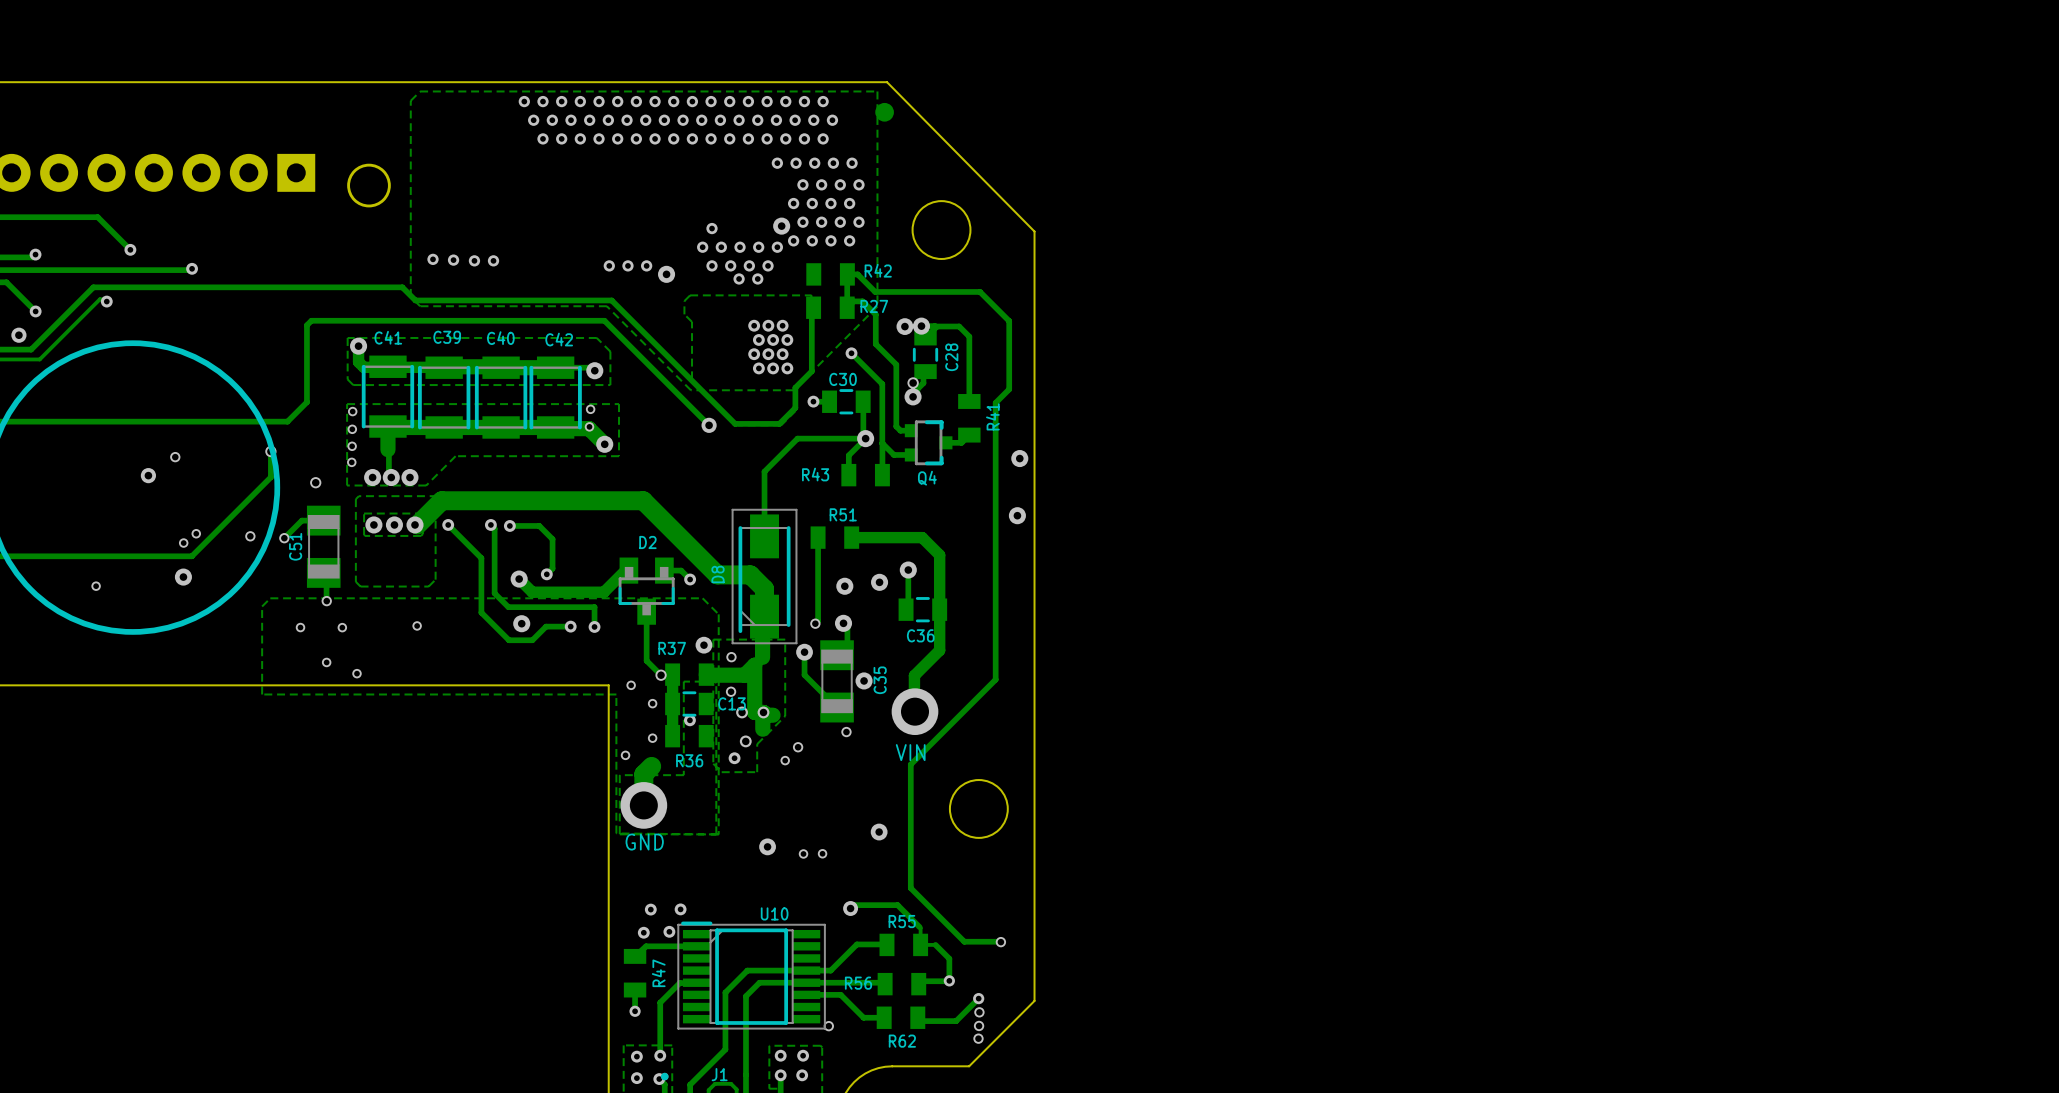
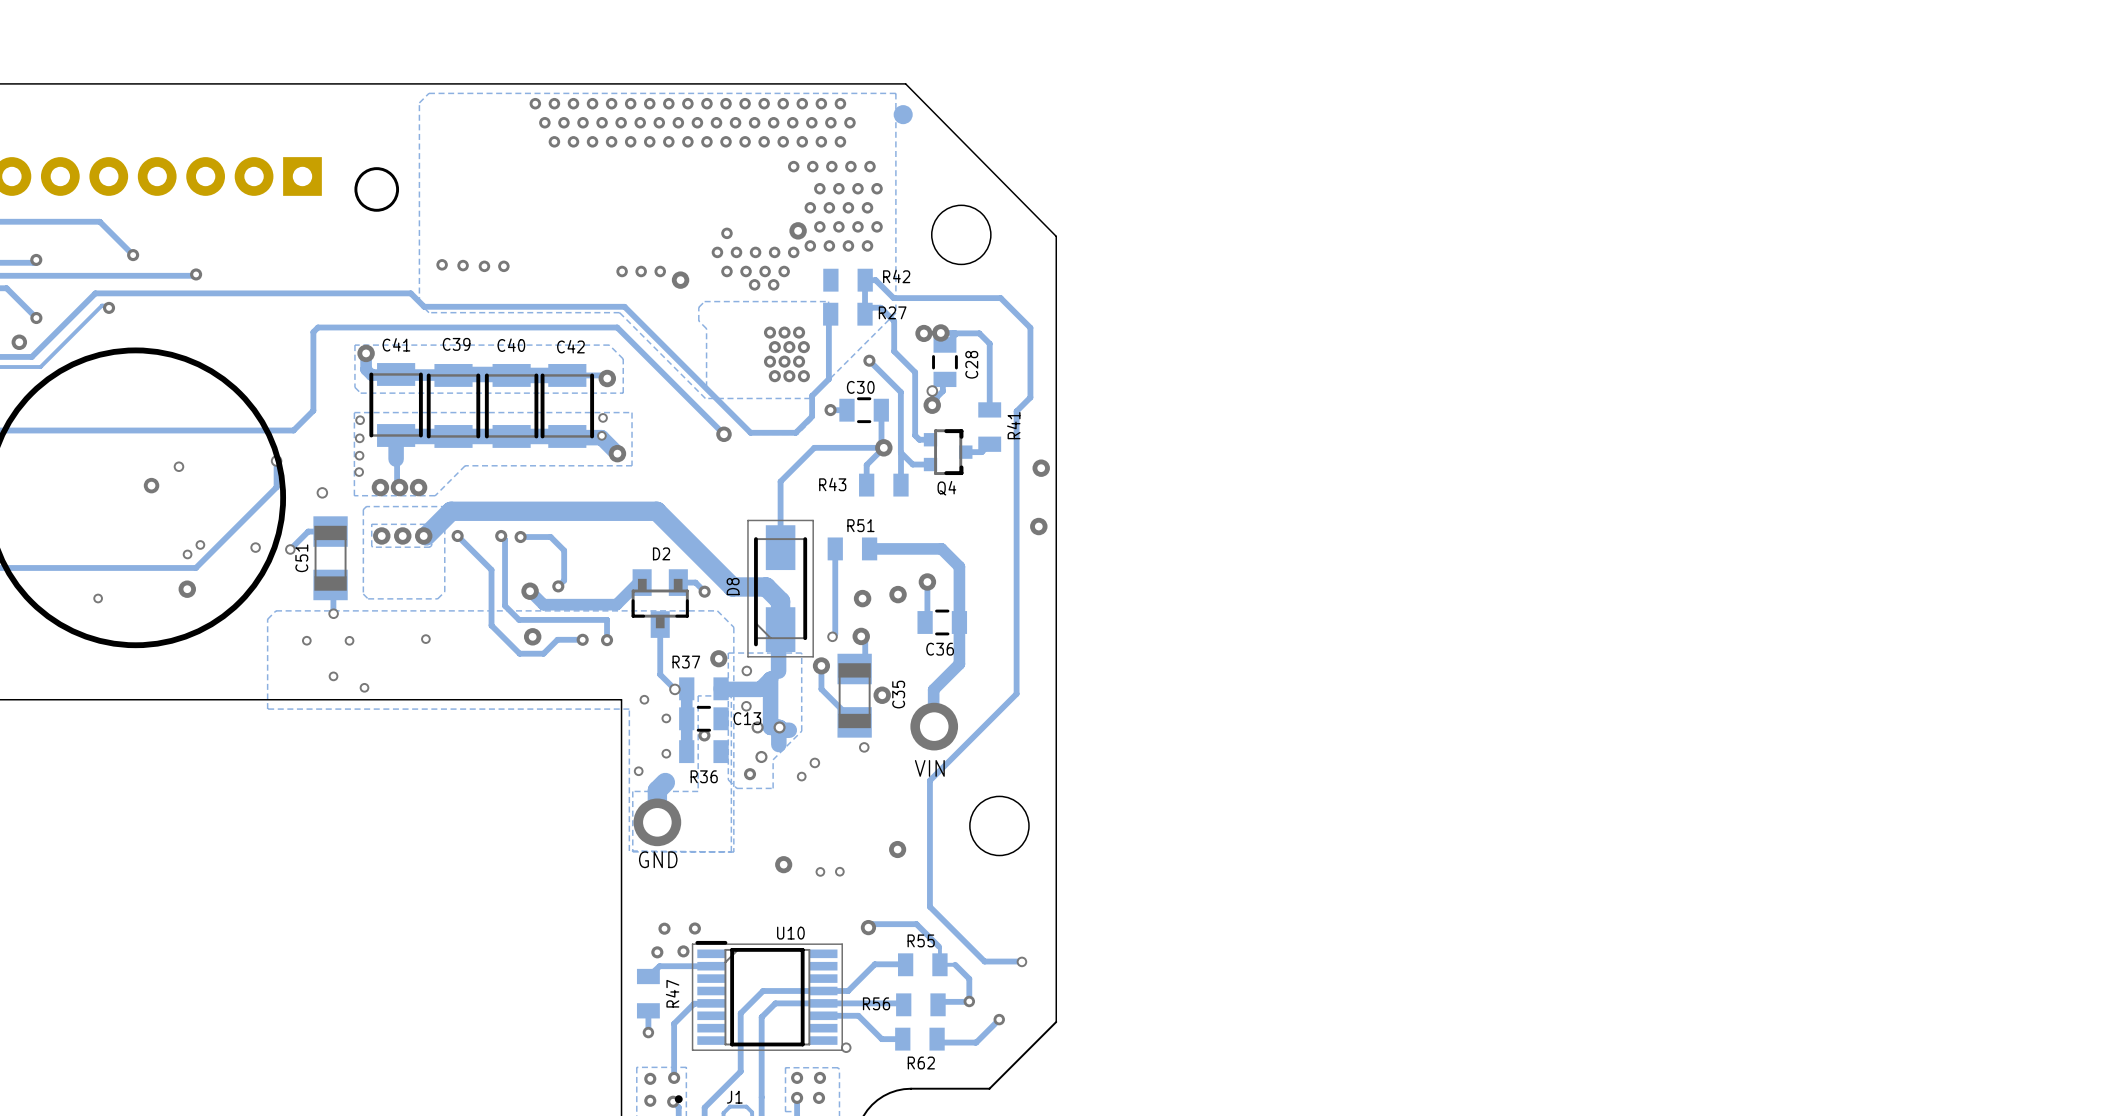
via: (979, 1012) -> none
via: (979, 1025) -> none
via: (978, 1038) -> none

